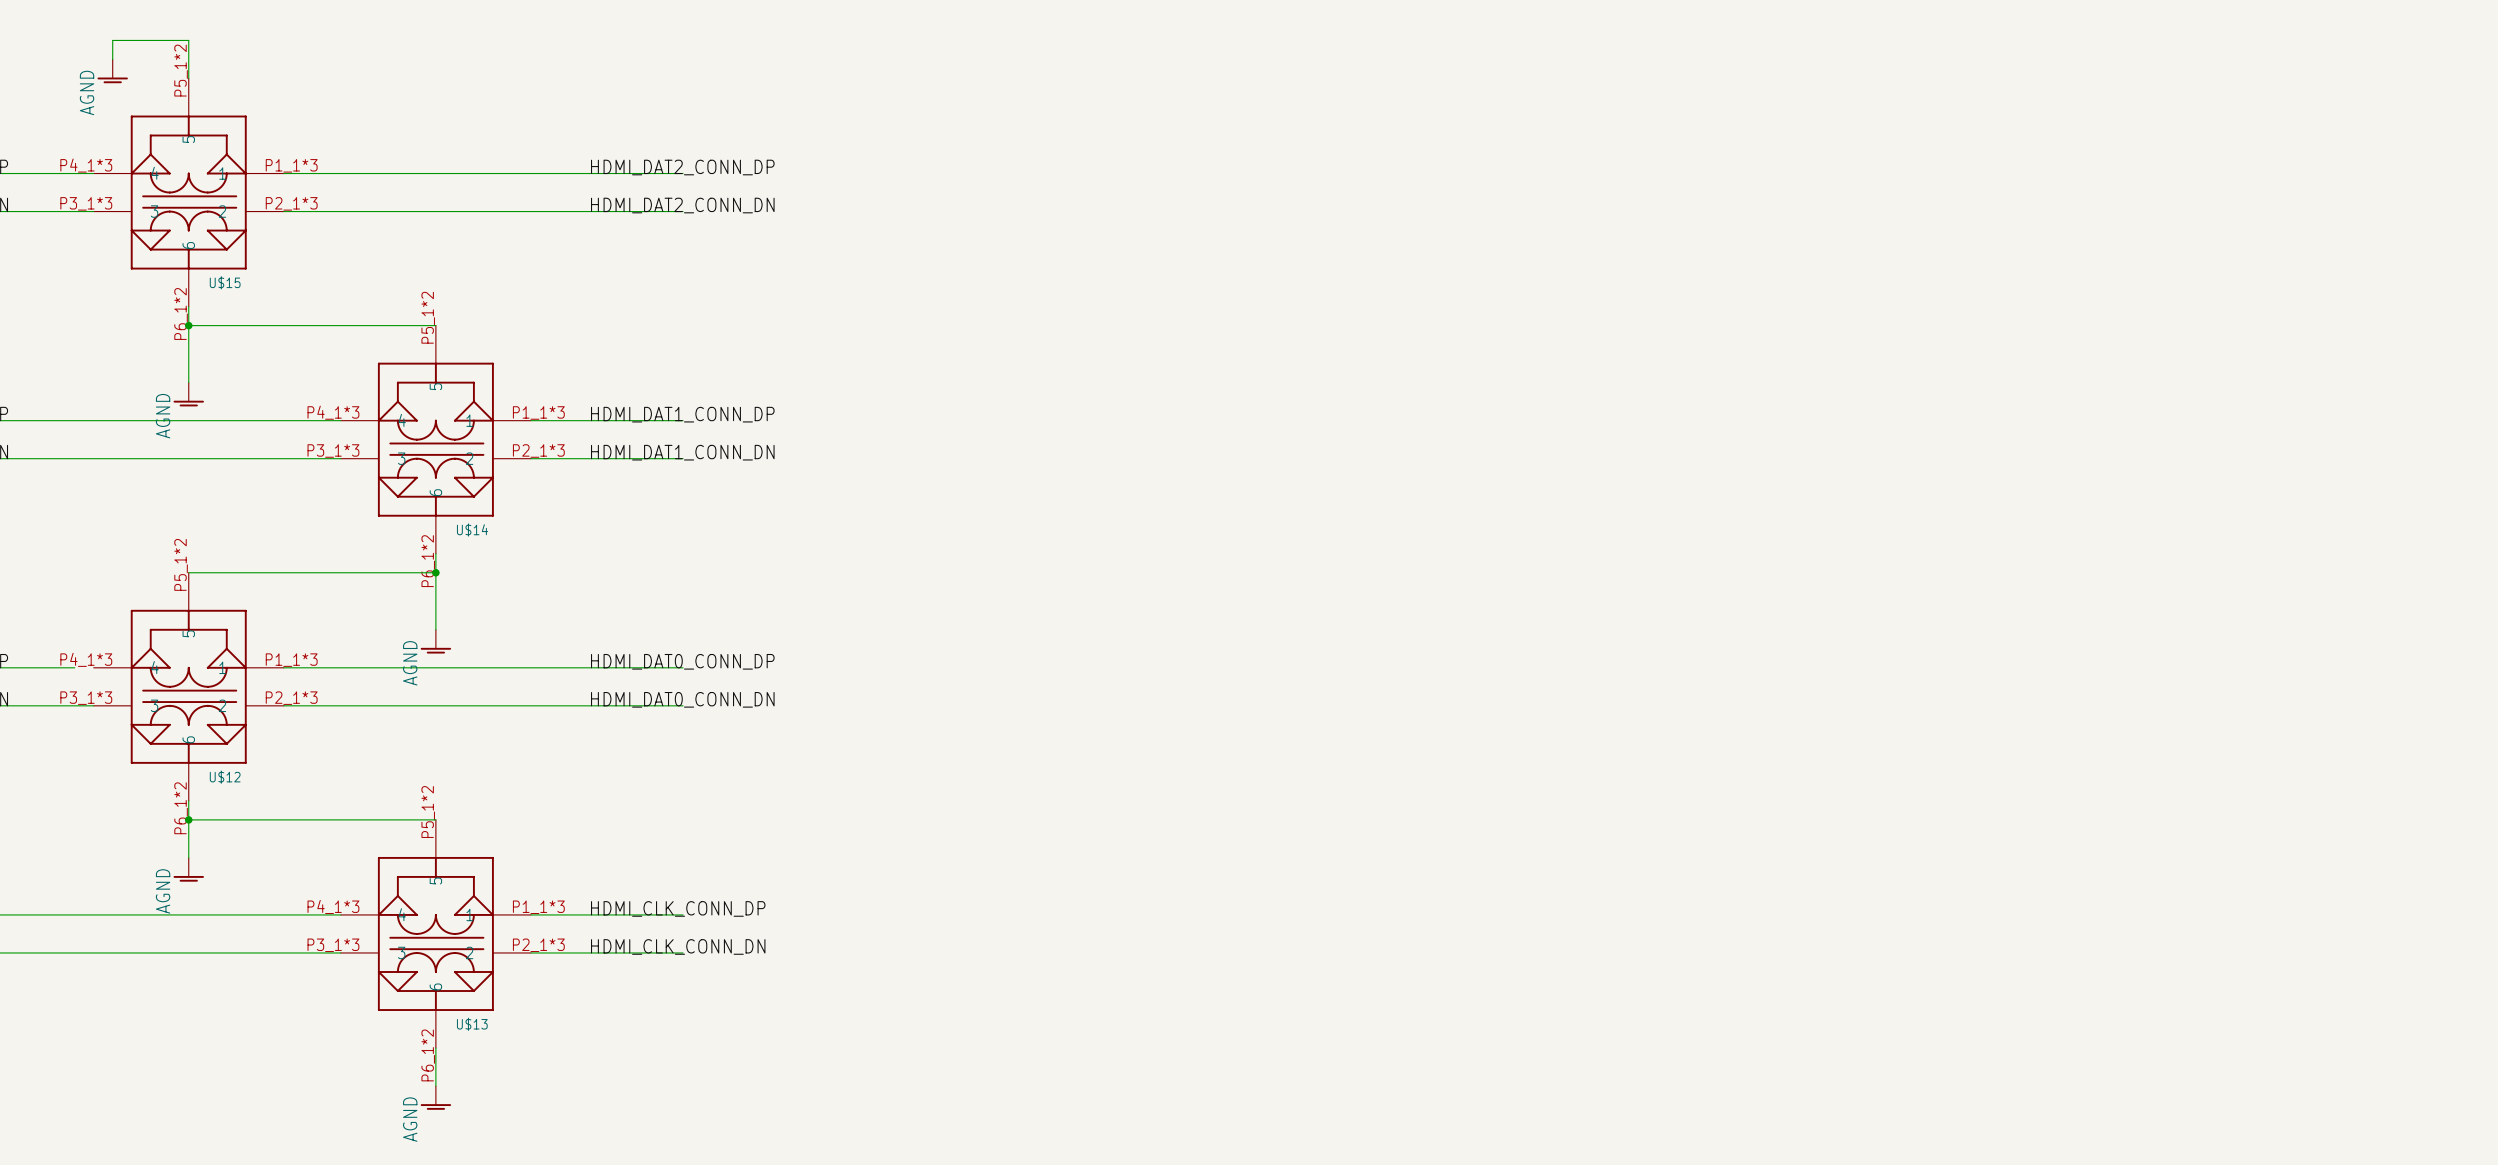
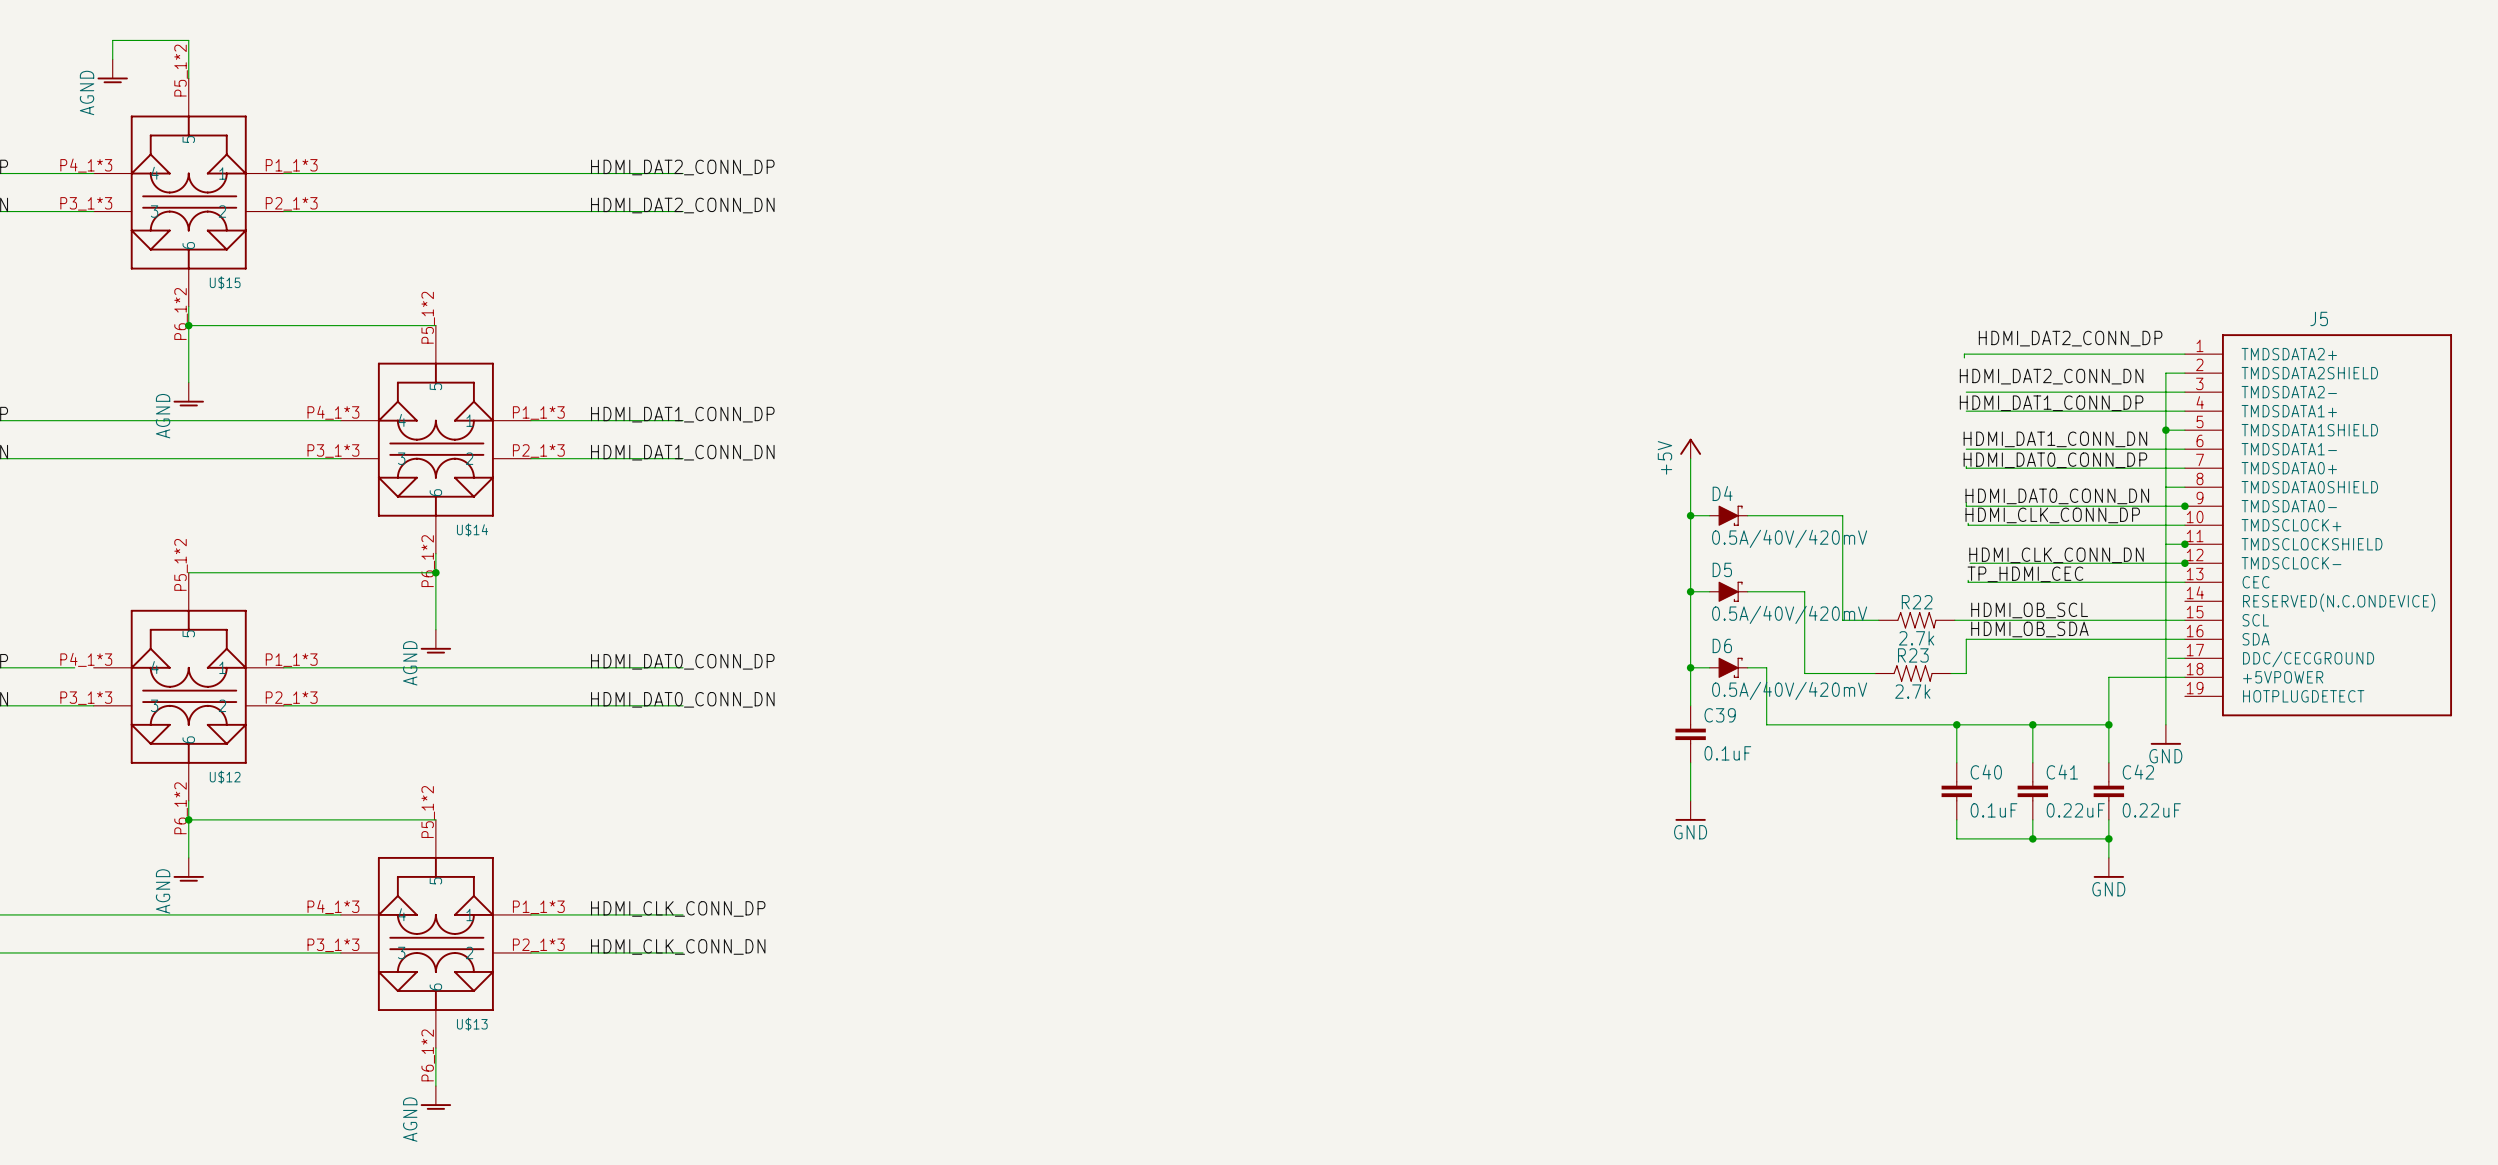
label: none -> HDMI_DAT2_CONN_DP (2070, 338)
wire: none -> (2184, 354) (1964, 354) (1964, 357)
wire: none -> (2184, 373) (2165, 373) (2165, 724)
label: none -> HDMI_DAT2_CONN_DN (2051, 376)
wire: none -> (1966, 392) (2184, 392)
label: none -> HDMI_DAT1_CONN_DP (2051, 403)
wire: none -> (1966, 411) (2184, 411)
wire: none -> (2165, 430) (2184, 430)
junction: none -> (2165, 430)
label: none -> HDMI_DAT1_CONN_DN (2055, 439)
power symbol: none -> +5V (1690, 448)
wire: none -> (1966, 449) (2184, 449)
wire: none -> (1690, 458) (1690, 705)
label: none -> HDMI_DAT0_CONN_DP (2055, 460)
wire: none -> (1966, 466) (1966, 468) (2184, 468)
wire: none -> (2165, 487) (2184, 487)
label: none -> HDMI_DAT0_CONN_DN (2057, 496)
wire: none -> (1966, 502) (1966, 506) (2186, 506)
junction: none -> (2184, 506)
wire: none -> (1690, 515) (1709, 515)
junction: none -> (1690, 515)
D4: none -> 0.5A/40V/420mV (1728, 515)
wire: none -> (1747, 515) (1842, 515) (1842, 620) (1878, 620)
label: none -> HDMI_CLK_CONN_DP (2052, 515)
wire: none -> (1968, 523) (1968, 525) (2184, 525)
J5: none -> (2318, 525)
wire: none -> (2165, 544) (2186, 544)
junction: none -> (2184, 544)
label: none -> HDMI_CLK_CONN_DN (2056, 555)
wire: none -> (1970, 563) (2186, 563)
junction: none -> (2184, 563)
label: none -> TP_HDMI_CEC (2025, 574)
wire: none -> (1968, 580) (1968, 582) (2184, 582)
wire: none -> (1690, 591) (1709, 591)
junction: none -> (1690, 591)
D5: none -> 0.5A/40V/420mV (1728, 591)
wire: none -> (1747, 591) (1804, 591) (1804, 673) (1875, 673)
label: none -> HDMI_OB_SCL (2029, 610)
R22: none -> 2.7k (1916, 620)
wire: none -> (1954, 620) (2184, 620)
label: none -> HDMI_OB_SDA (2029, 629)
wire: none -> (2184, 639) (1966, 639) (1966, 673) (1951, 673)
wire: none -> (2167, 658) (2184, 658)
wire: none -> (1690, 667) (1709, 667)
junction: none -> (1690, 667)
D6: none -> 0.5A/40V/420mV (1728, 667)
wire: none -> (1747, 667) (1766, 667) (1766, 724) (2108, 724)
R23: none -> 2.7k (1913, 673)
wire: none -> (2184, 677) (2108, 677) (2108, 762)
wire: none -> (1956, 724) (1956, 762)
junction: none -> (1956, 724)
wire: none -> (2032, 724) (2032, 762)
junction: none -> (2032, 724)
junction: none -> (2108, 724)
C39: none -> 0.1uF (1690, 734)
power symbol: none -> GND (2165, 734)
wire: none -> (1690, 762) (1690, 800)
C40: none -> 0.1uF (1956, 791)
C41: none -> 0.22uF (2032, 791)
C42: none -> 0.22uF (2108, 791)
power symbol: none -> GND (1690, 810)
wire: none -> (1956, 819) (1956, 838) (2108, 838)
wire: none -> (2032, 819) (2032, 838)
wire: none -> (2108, 819) (2108, 857)
junction: none -> (2032, 838)
junction: none -> (2108, 838)
power symbol: none -> GND (2108, 867)

